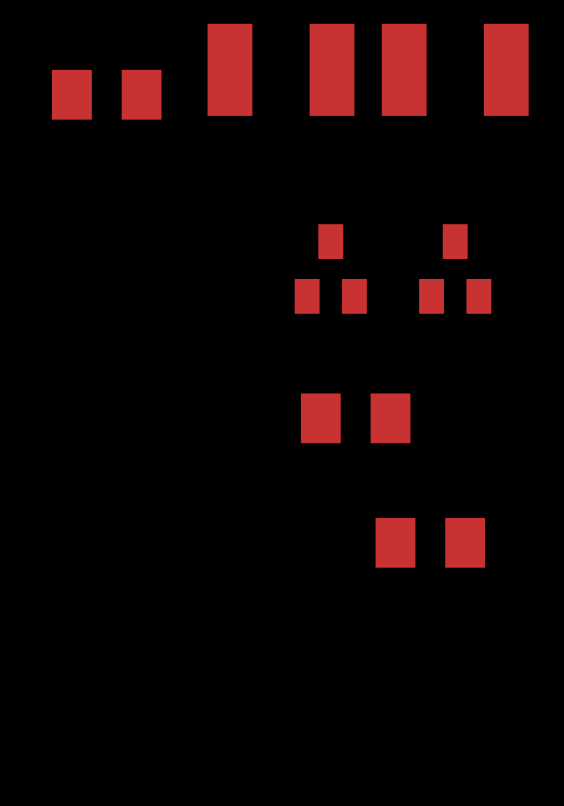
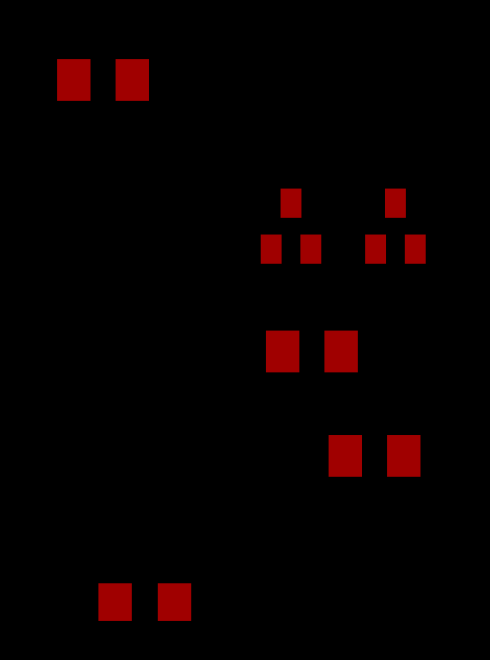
part: (280, 69) -> none
part: (455, 69) -> none
part: none -> (144, 602)

